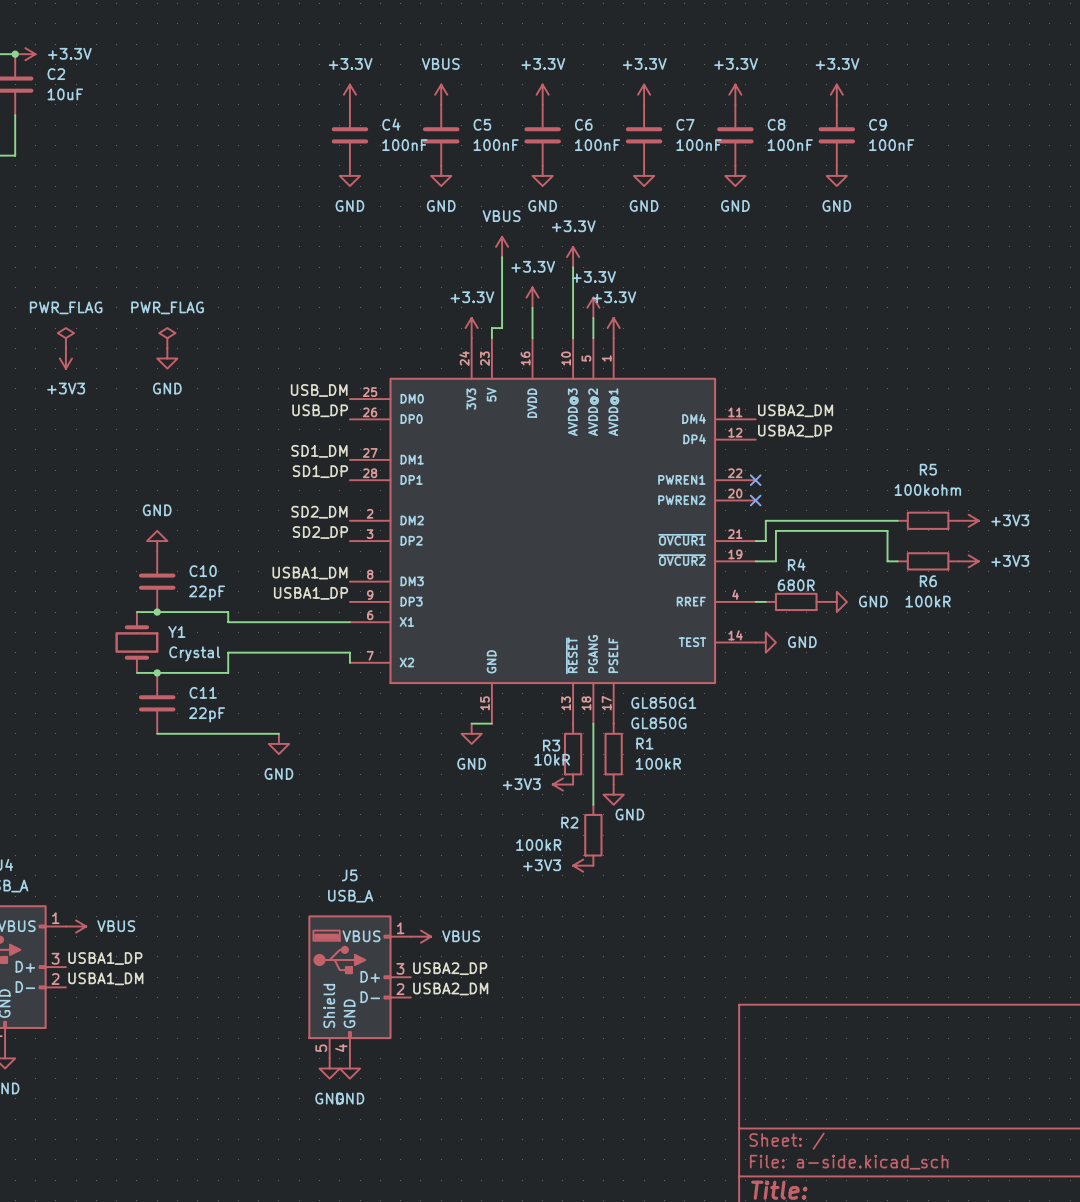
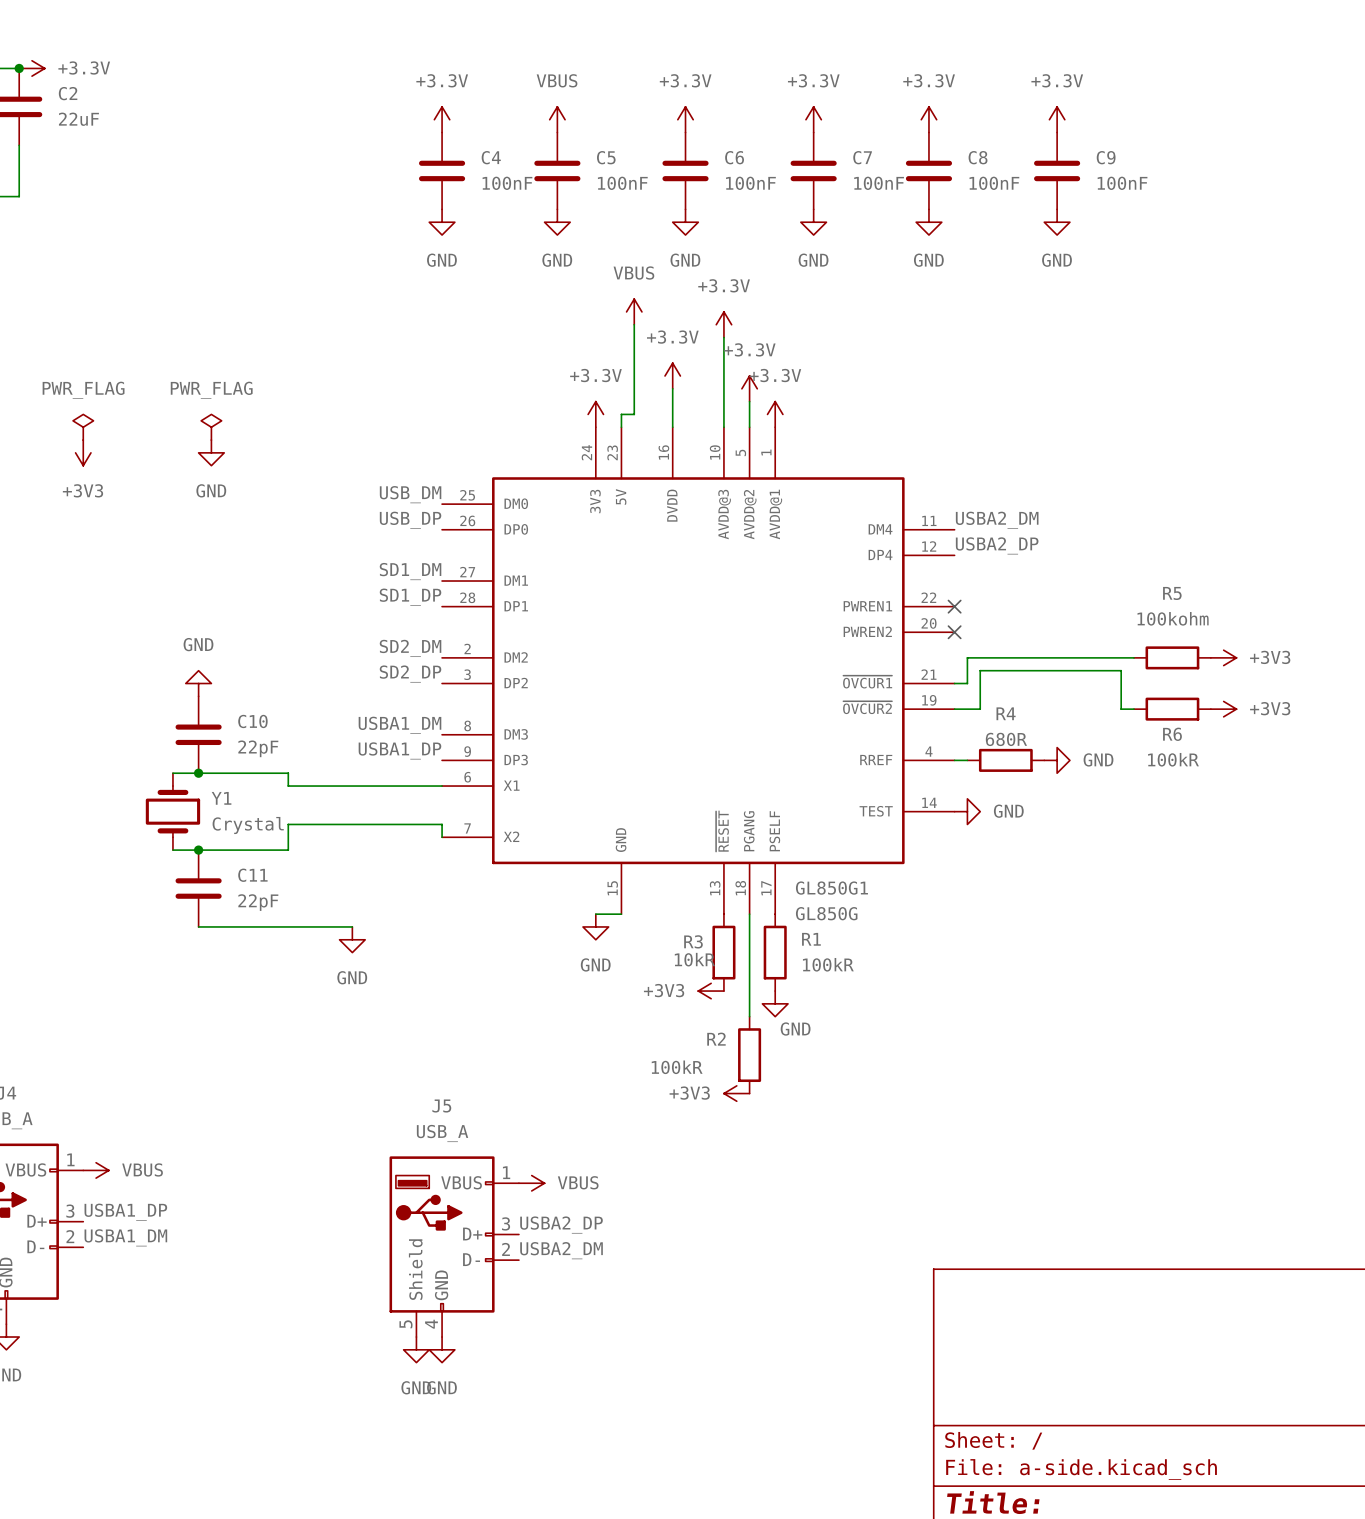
C2 value: 10uF (65, 94) -> 22uF (78, 119)

